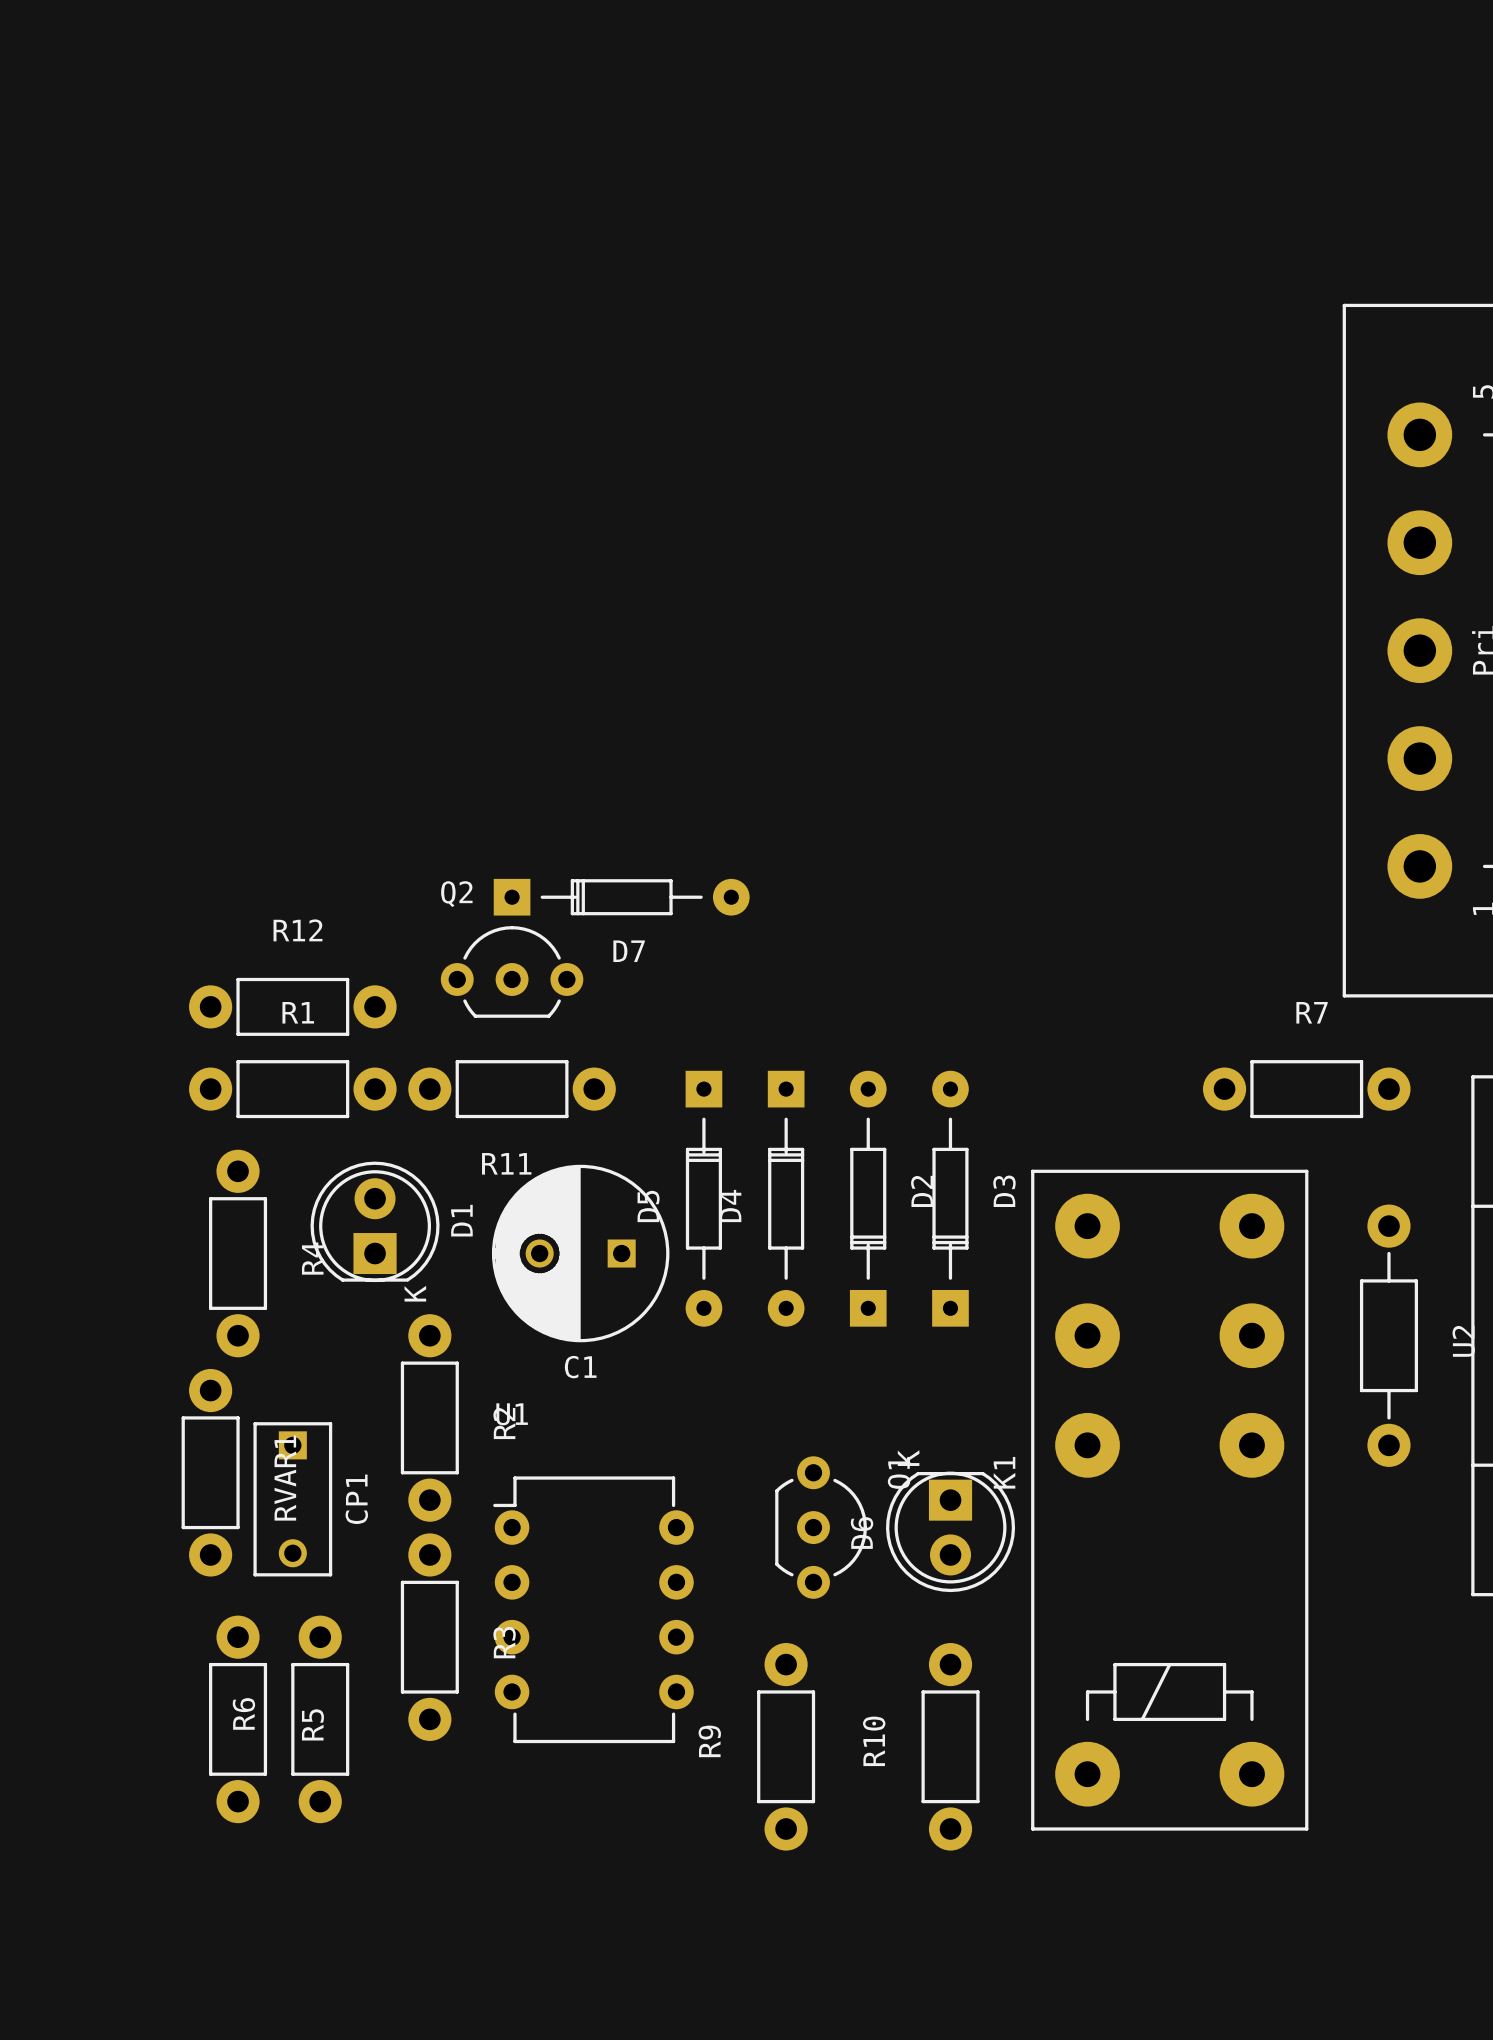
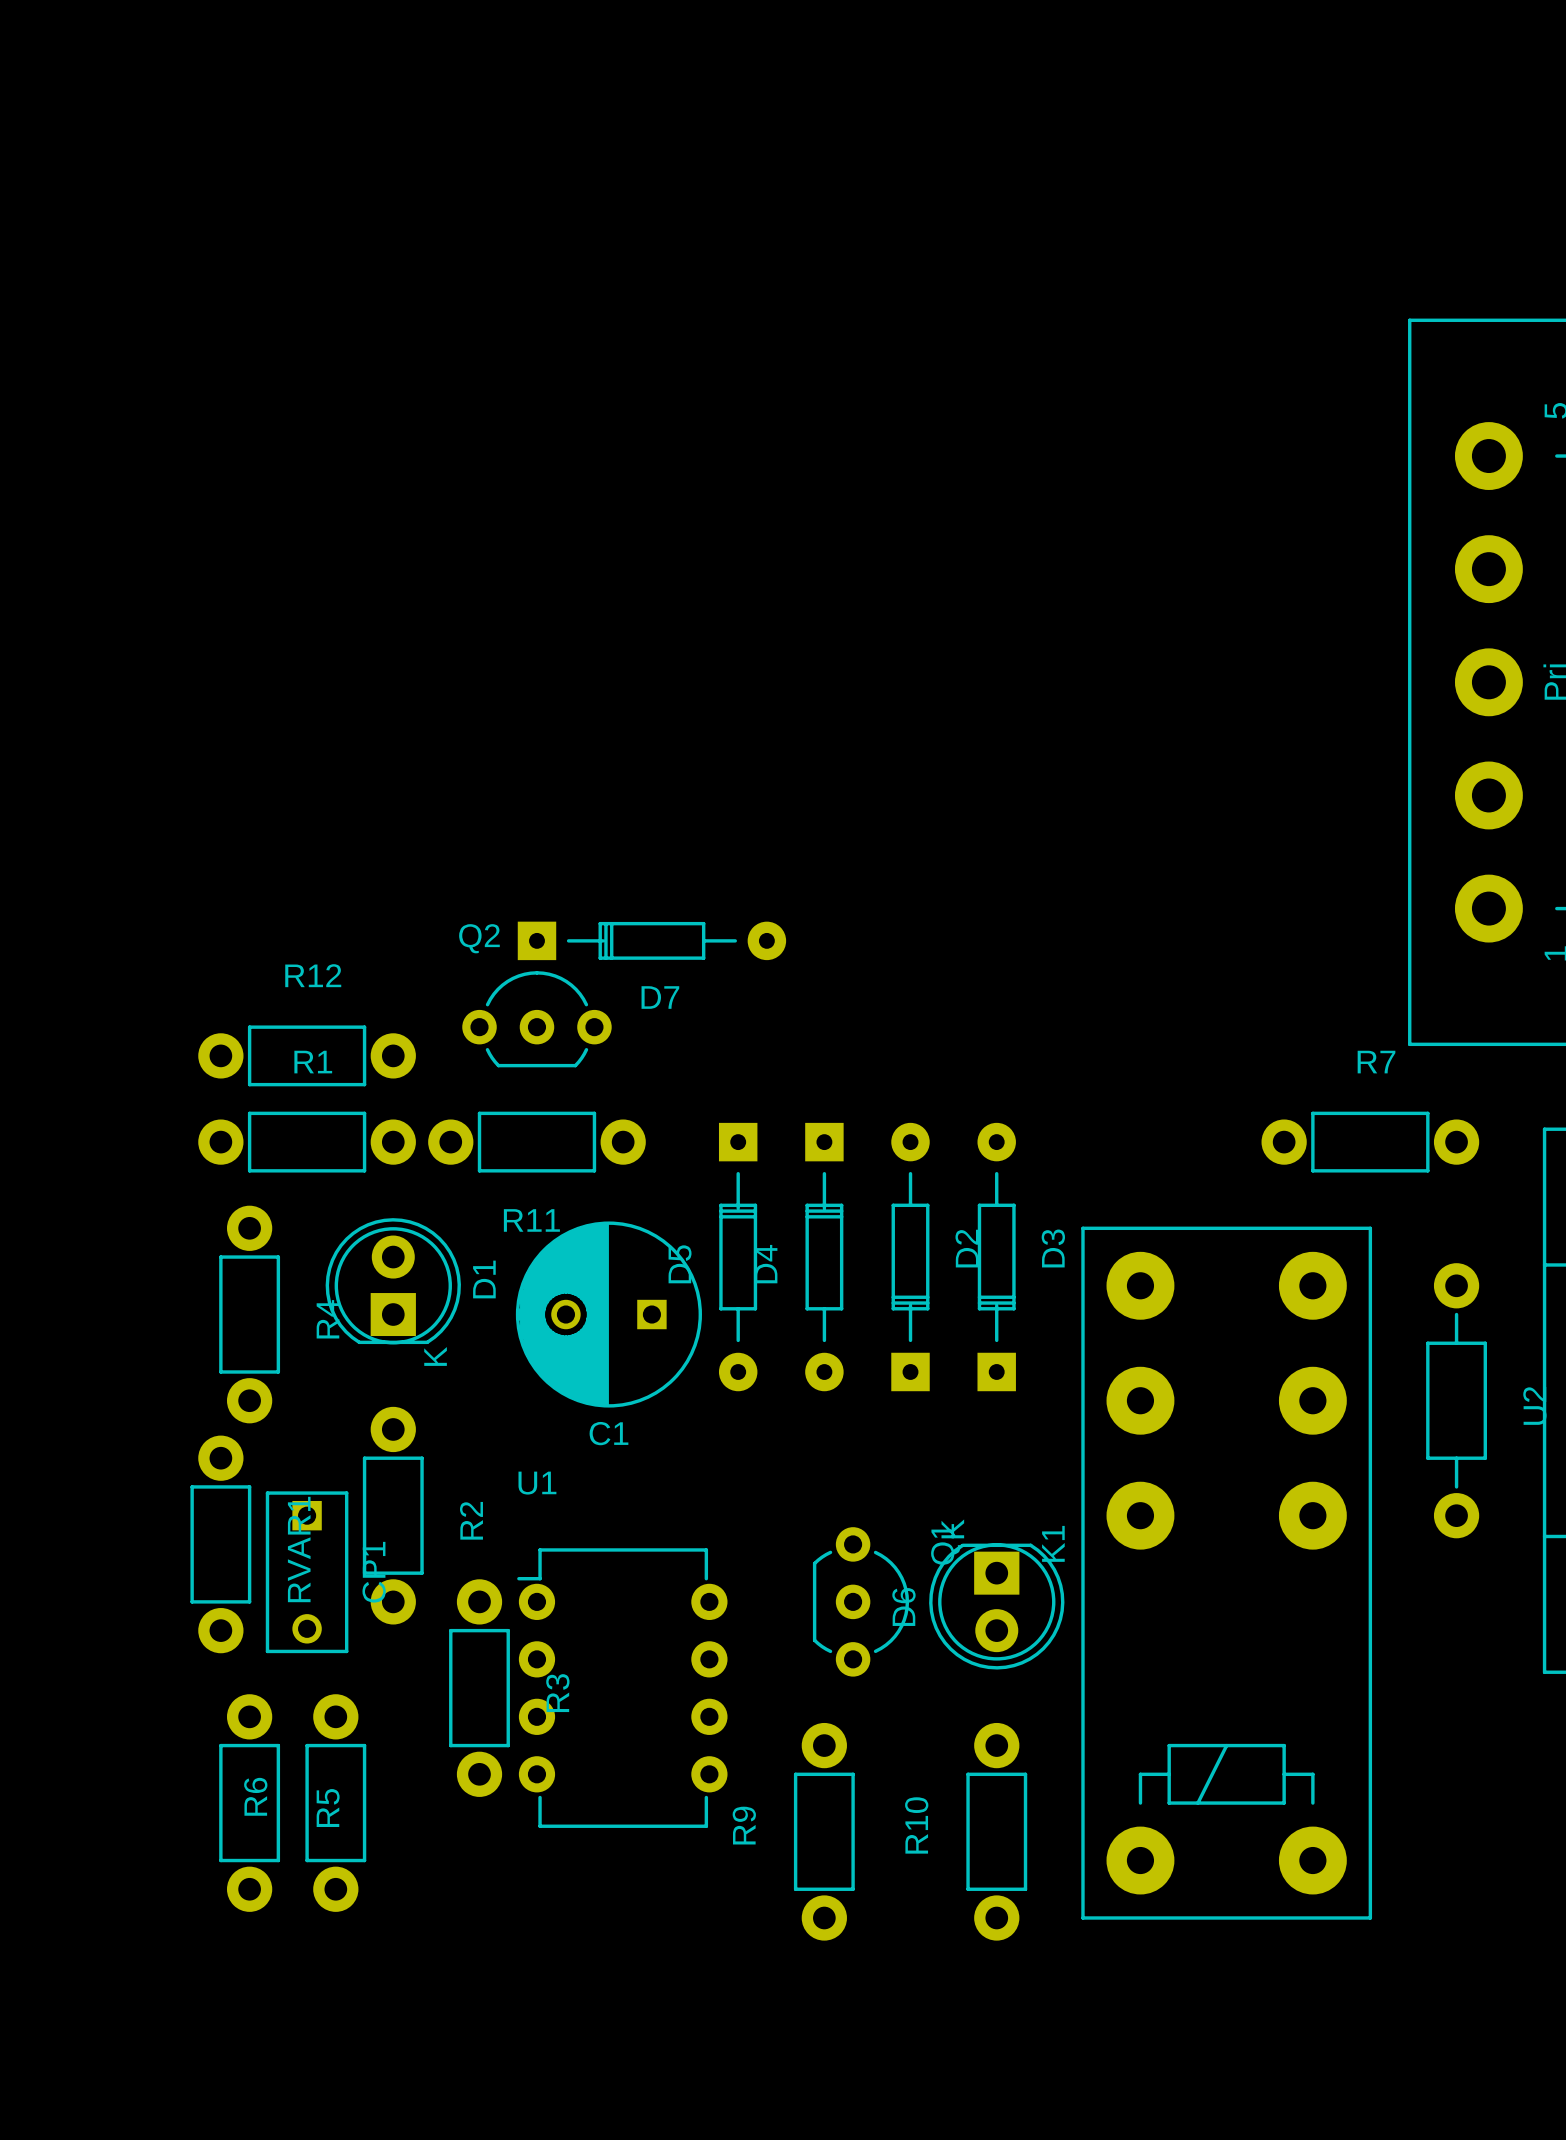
R2 position: (429, 1417) -> (393, 1515)
R3 position: (429, 1637) -> (479, 1688)

